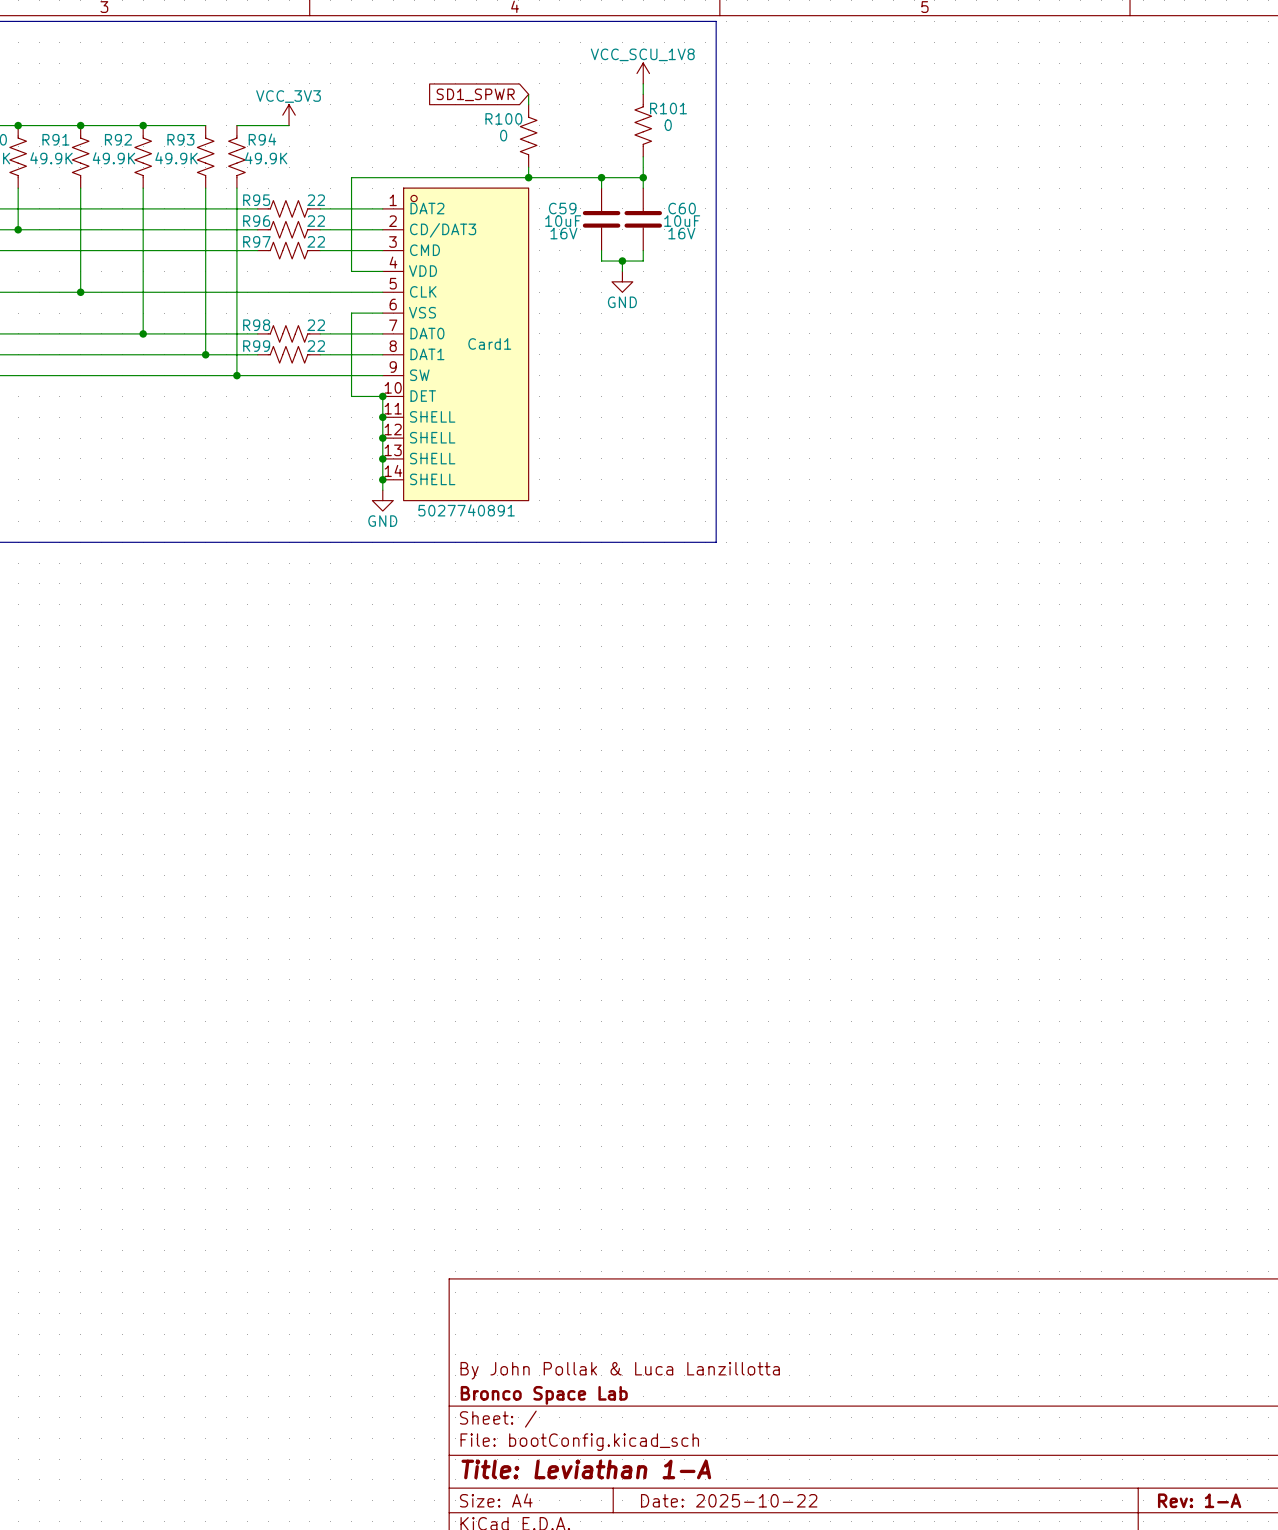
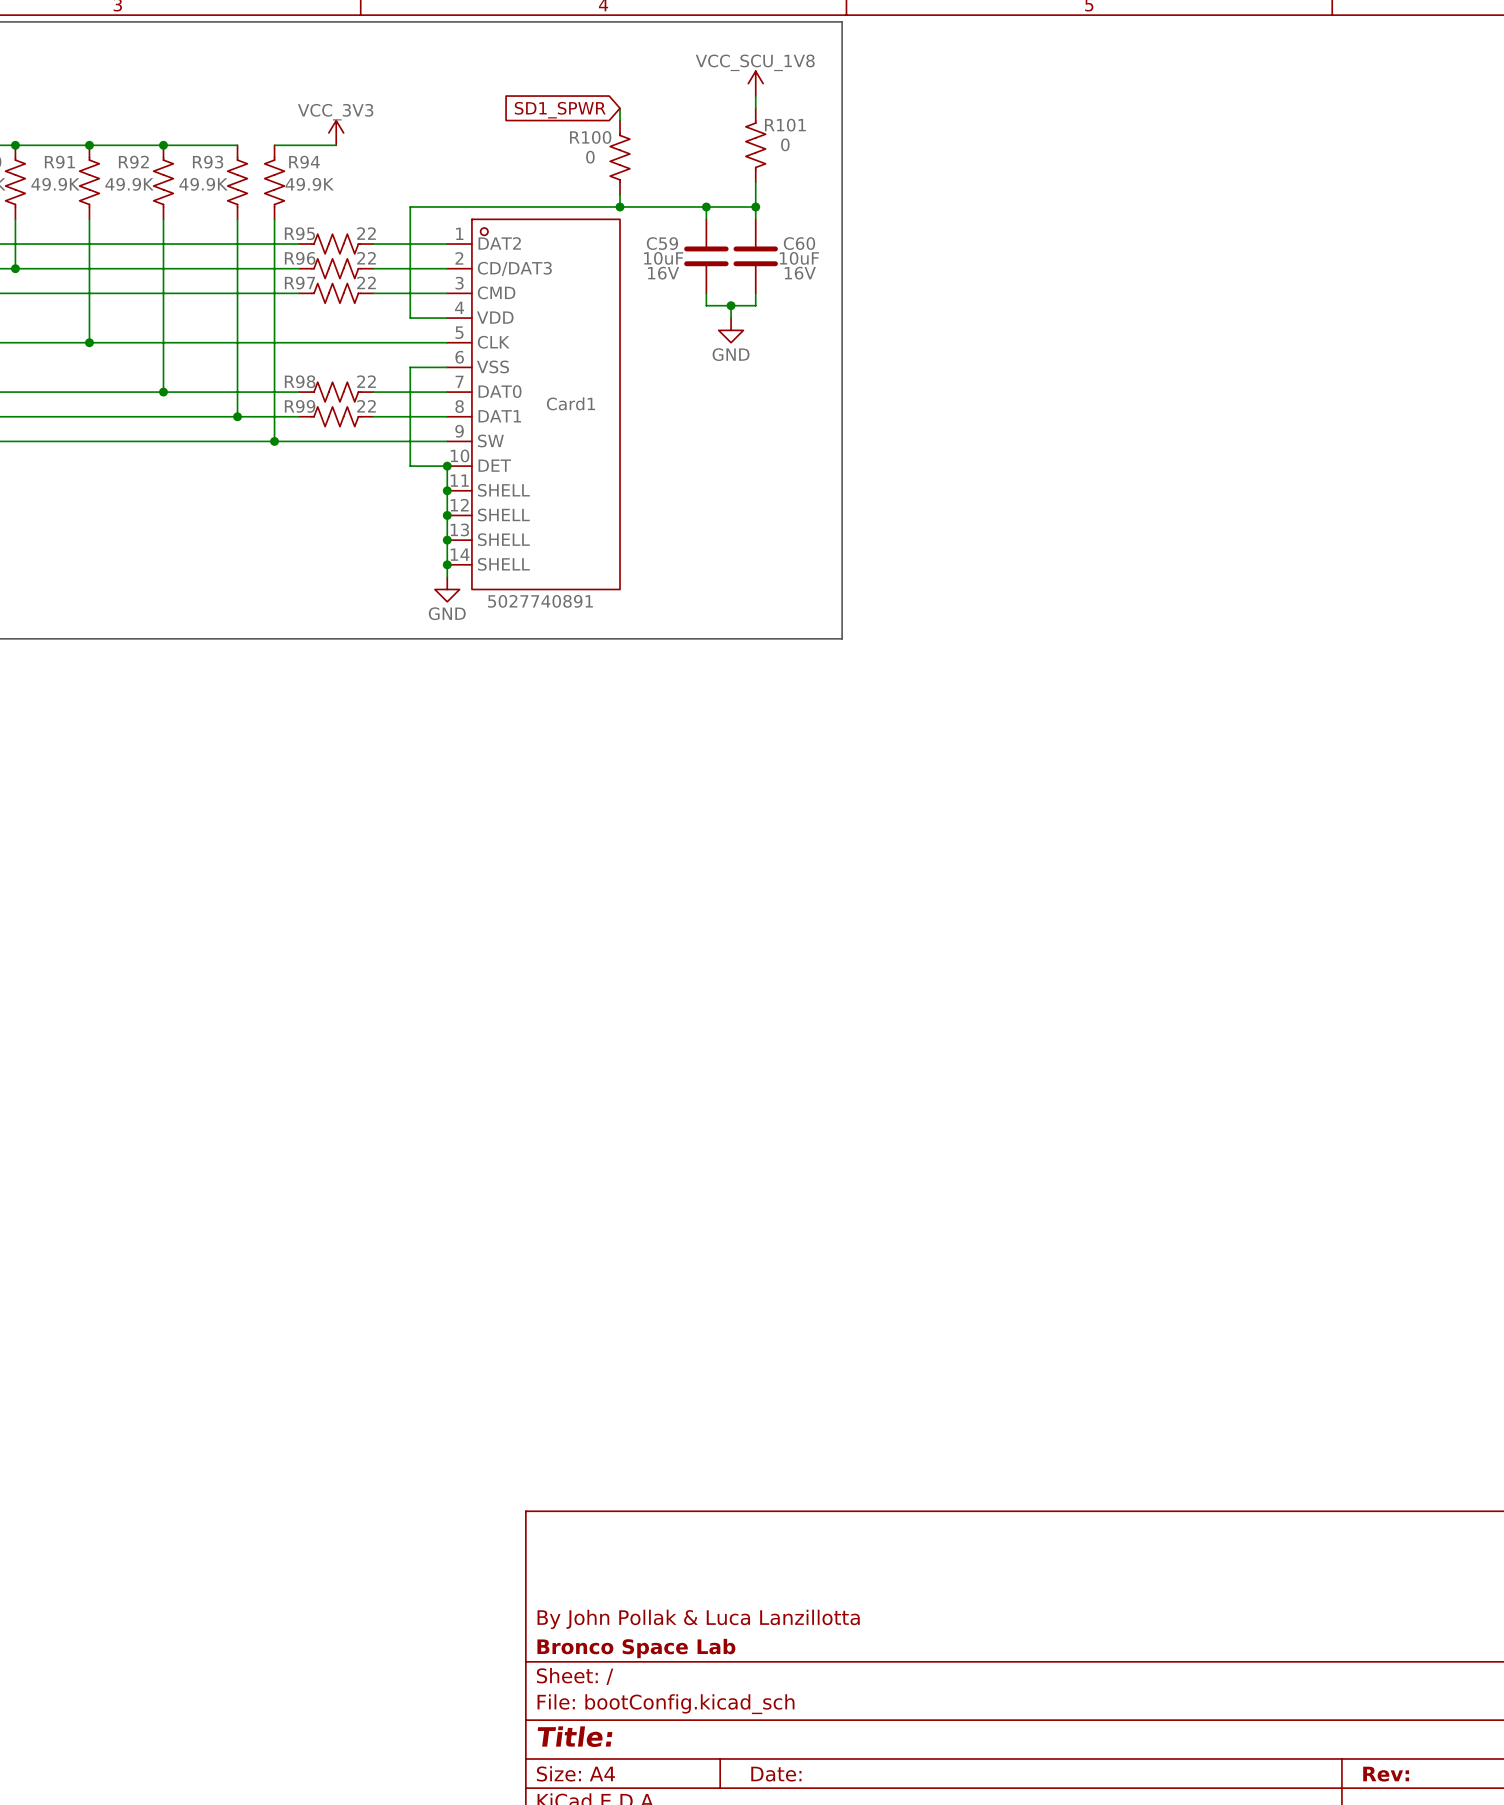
title block: Title: Leviathan 1-A (586, 1469) -> Title: (575, 1736)
title block: Date: 2025-10-22 (729, 1500) -> Date: (776, 1774)
title block: Rev: 1-A (1199, 1500) -> Rev: (1386, 1774)

